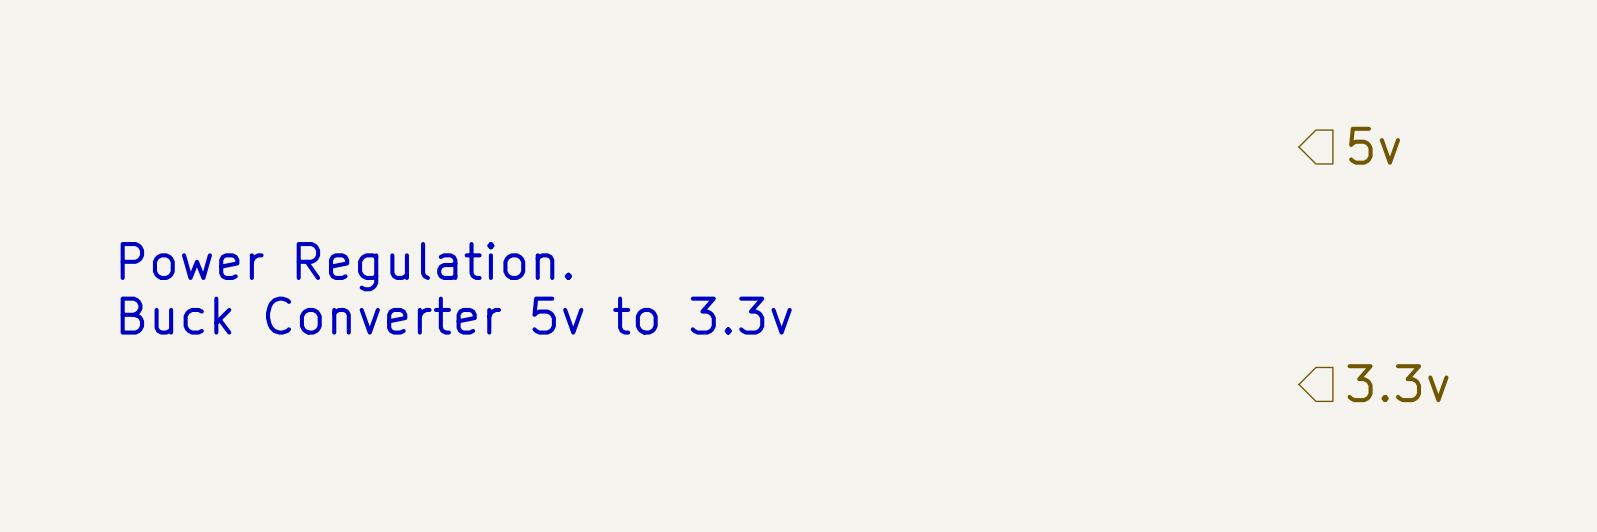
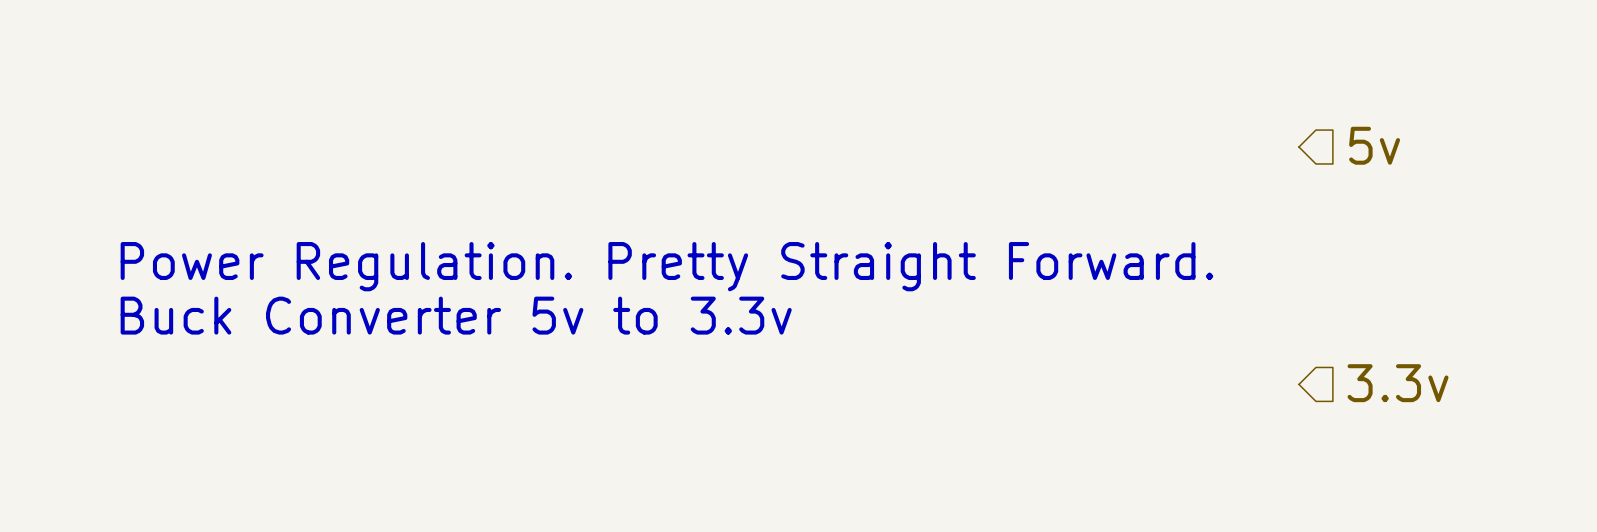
text: Power Regulation. (346, 266) -> Power Regulation. Pretty Straight Forward. (666, 266)

